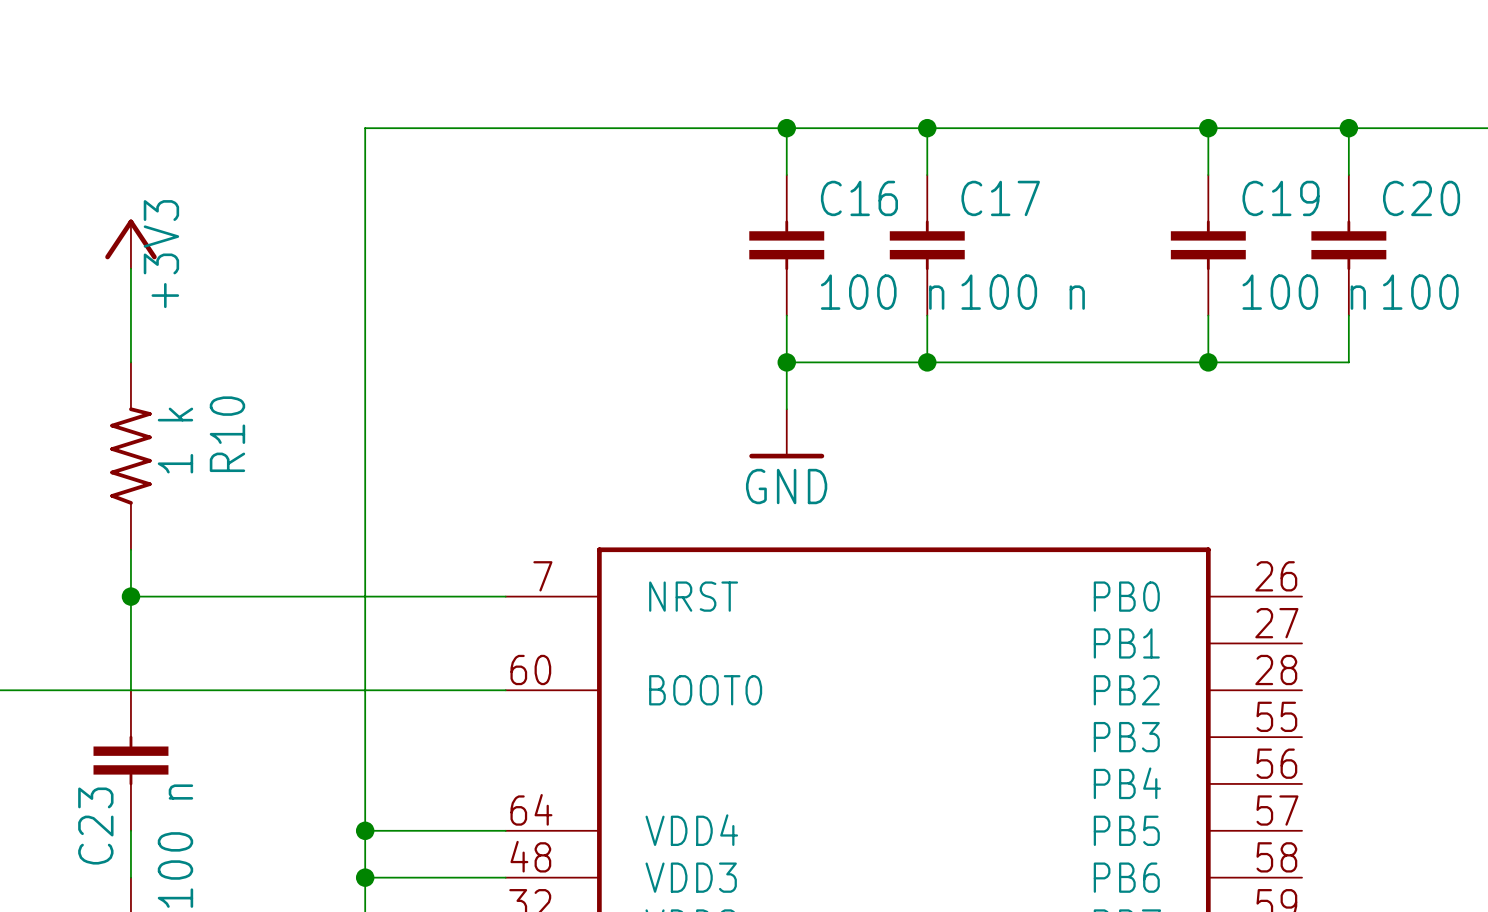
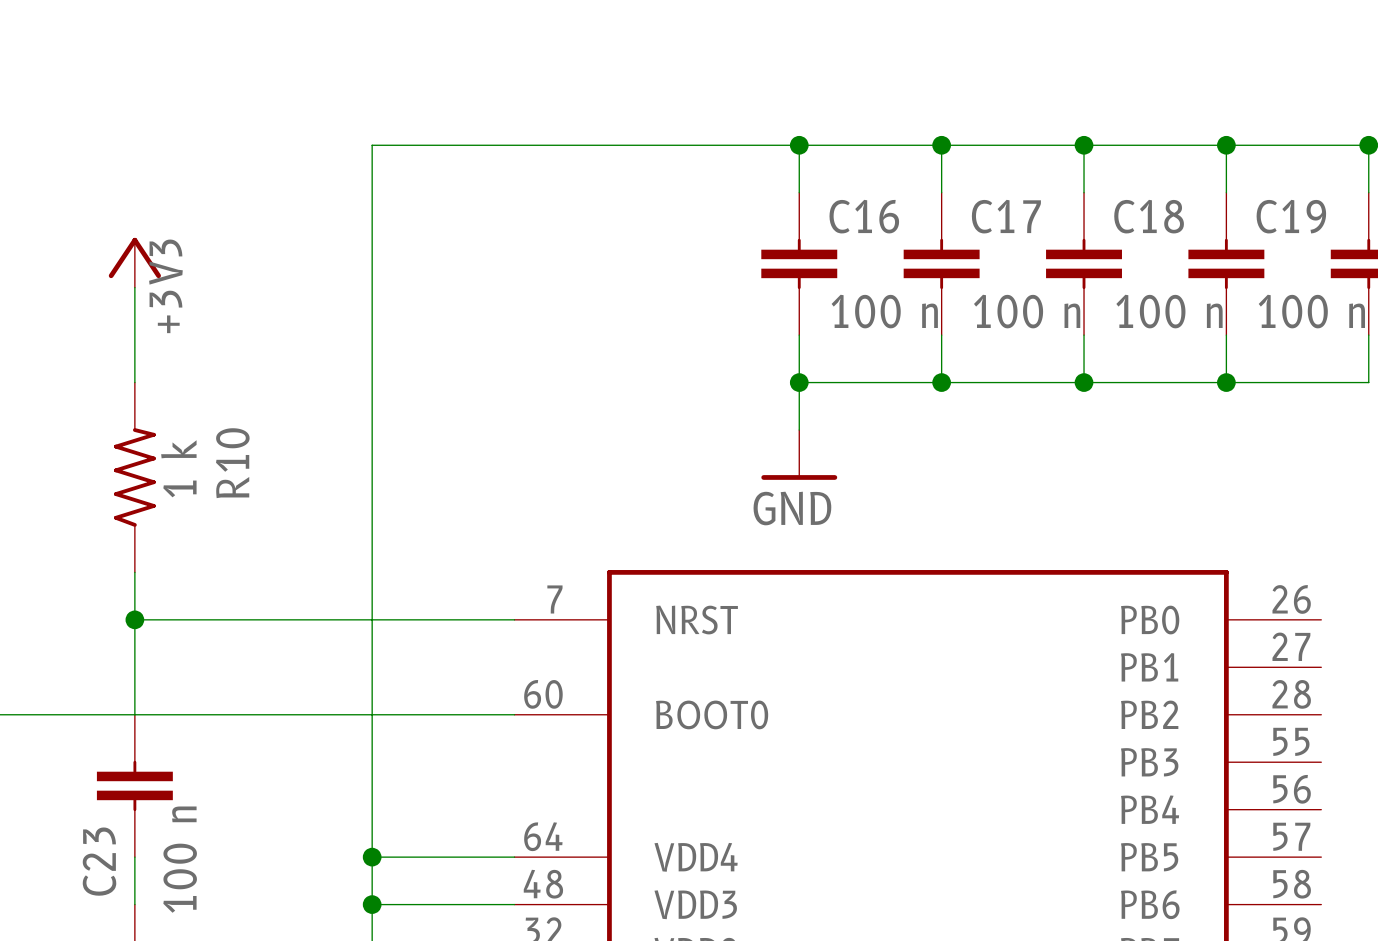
wire: none -> (1084, 145) (1084, 192)
junction: none -> (1084, 145)
C18: none -> 100 n (1084, 263)
wire: none -> (1084, 335) (1084, 382)
junction: none -> (1084, 382)

